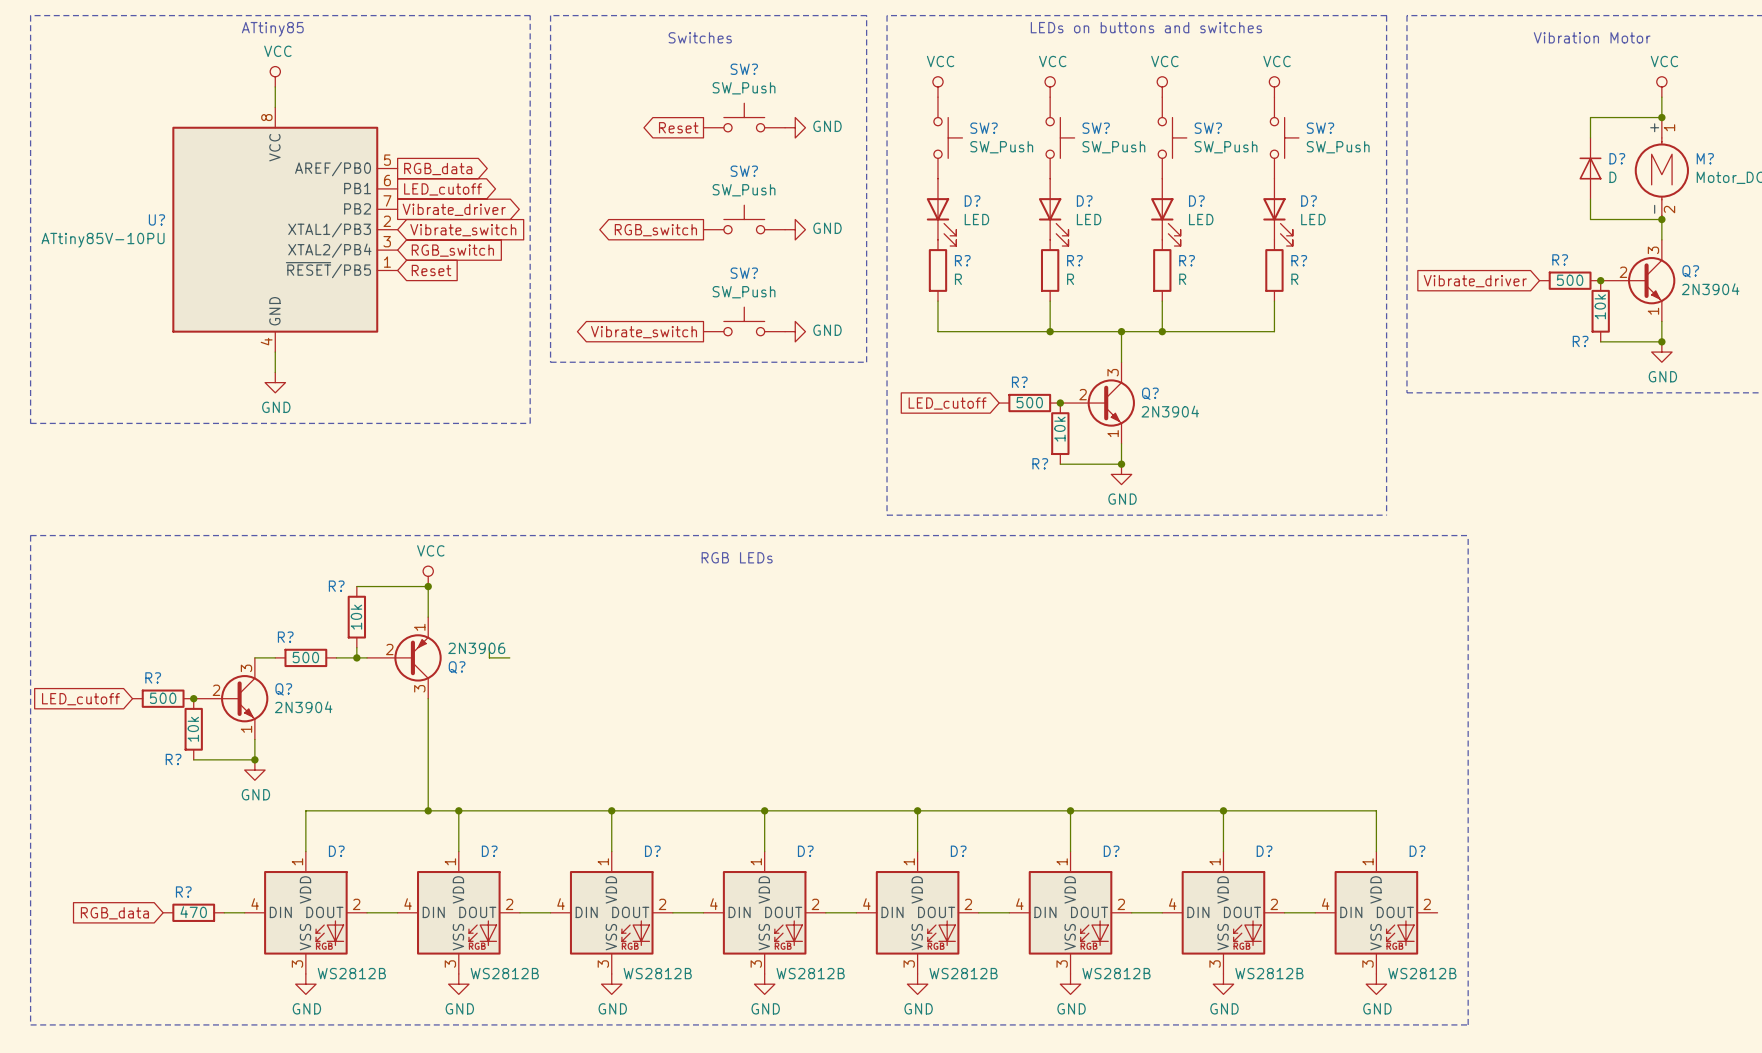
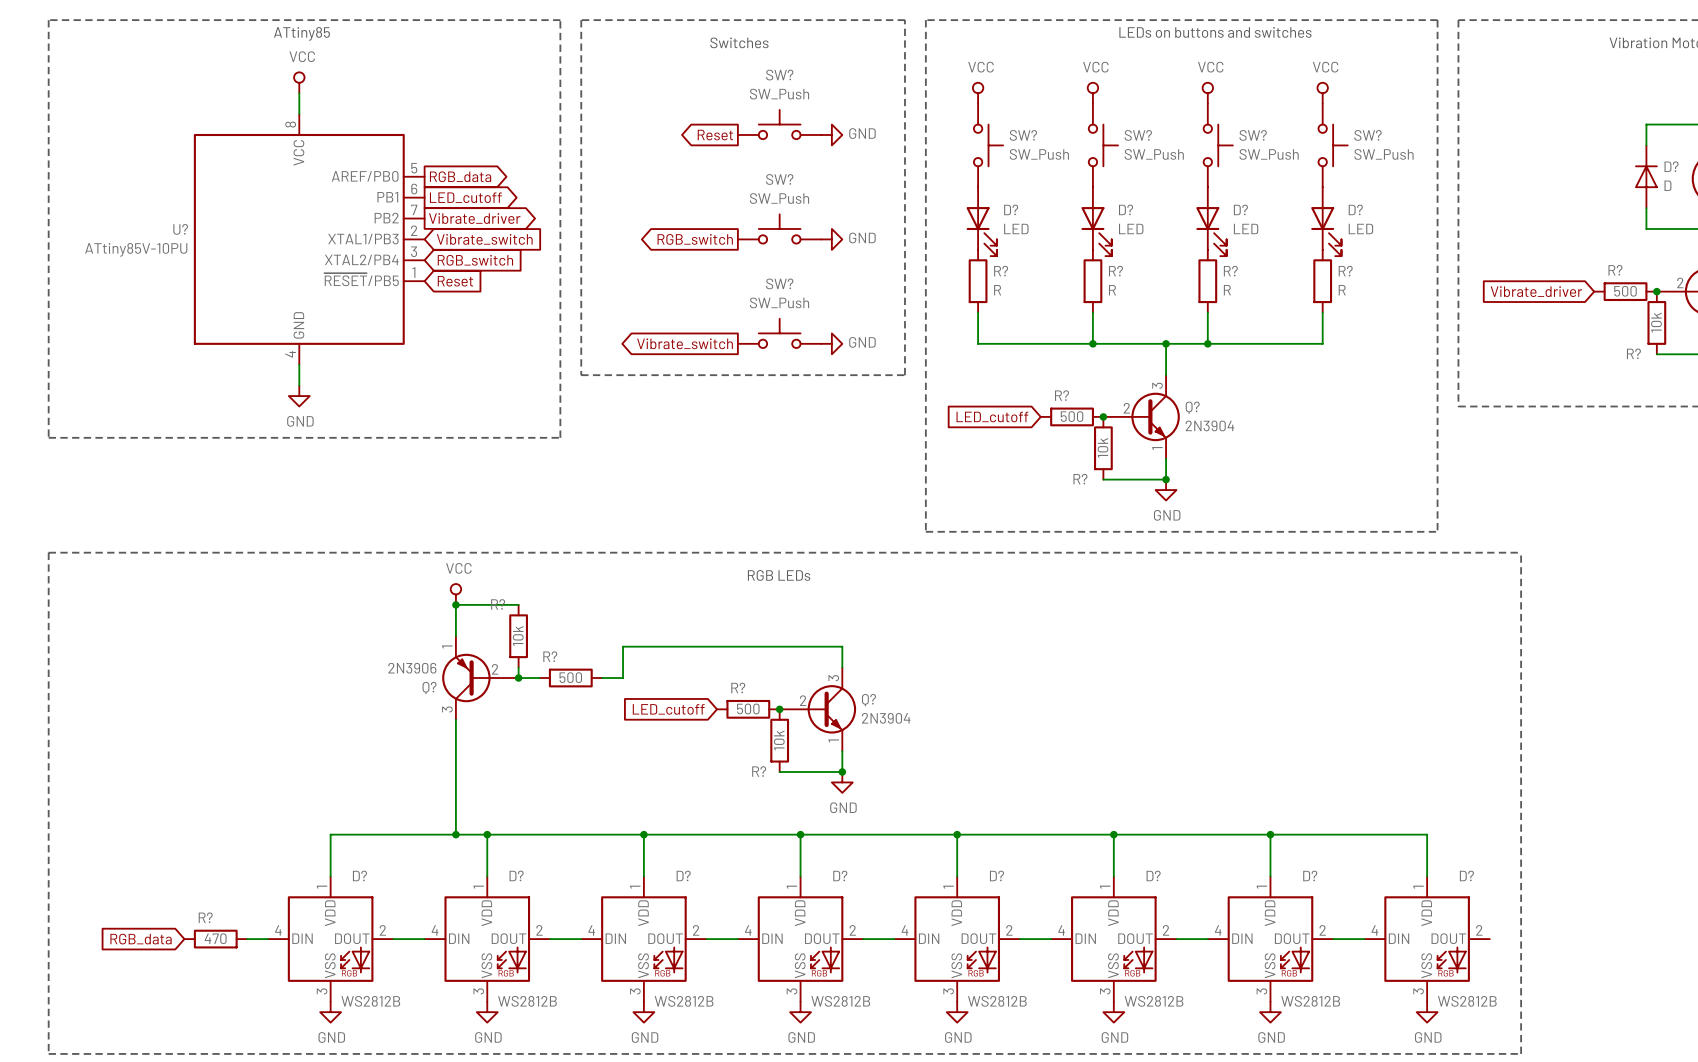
wire: (356, 586) (428, 586) -> (518, 604) (455, 604)
R? position: (356, 617) -> (518, 636)
wire: (356, 647) (356, 657) -> none
wire: none -> (842, 667) (842, 646) (623, 646) (623, 678) (602, 678)
wire: (254, 657) (275, 657) -> none
R?: 500 (305, 657) -> none
wire: (336, 657) (367, 657) -> none
junction: (356, 657) -> none
Q?: 2N3906 (404, 657) -> none
Q?: none -> 2N3906 (480, 678)
junction: none -> (518, 678)
R?: none -> 500 (570, 678)
global label: none -> LED_cutoff (668, 709)
R?: none -> 500 (748, 709)
junction: none -> (779, 709)
Q?: none -> 2N3904 (817, 709)
R?: 500 (163, 698) -> none
junction: (193, 698) -> none
Q?: 2N3904 (231, 698) -> none
global label: LED_cutoff (80, 699) -> none
R?: none -> 10k (779, 740)
R?: 10k (193, 729) -> none
wire: none -> (842, 751) (842, 771) (779, 771)
wire: (254, 739) (254, 759) (193, 759) -> none
junction: none -> (842, 771)
junction: (254, 759) -> none
power symbol: none -> GND (842, 782)
power symbol: GND (254, 770) -> none

